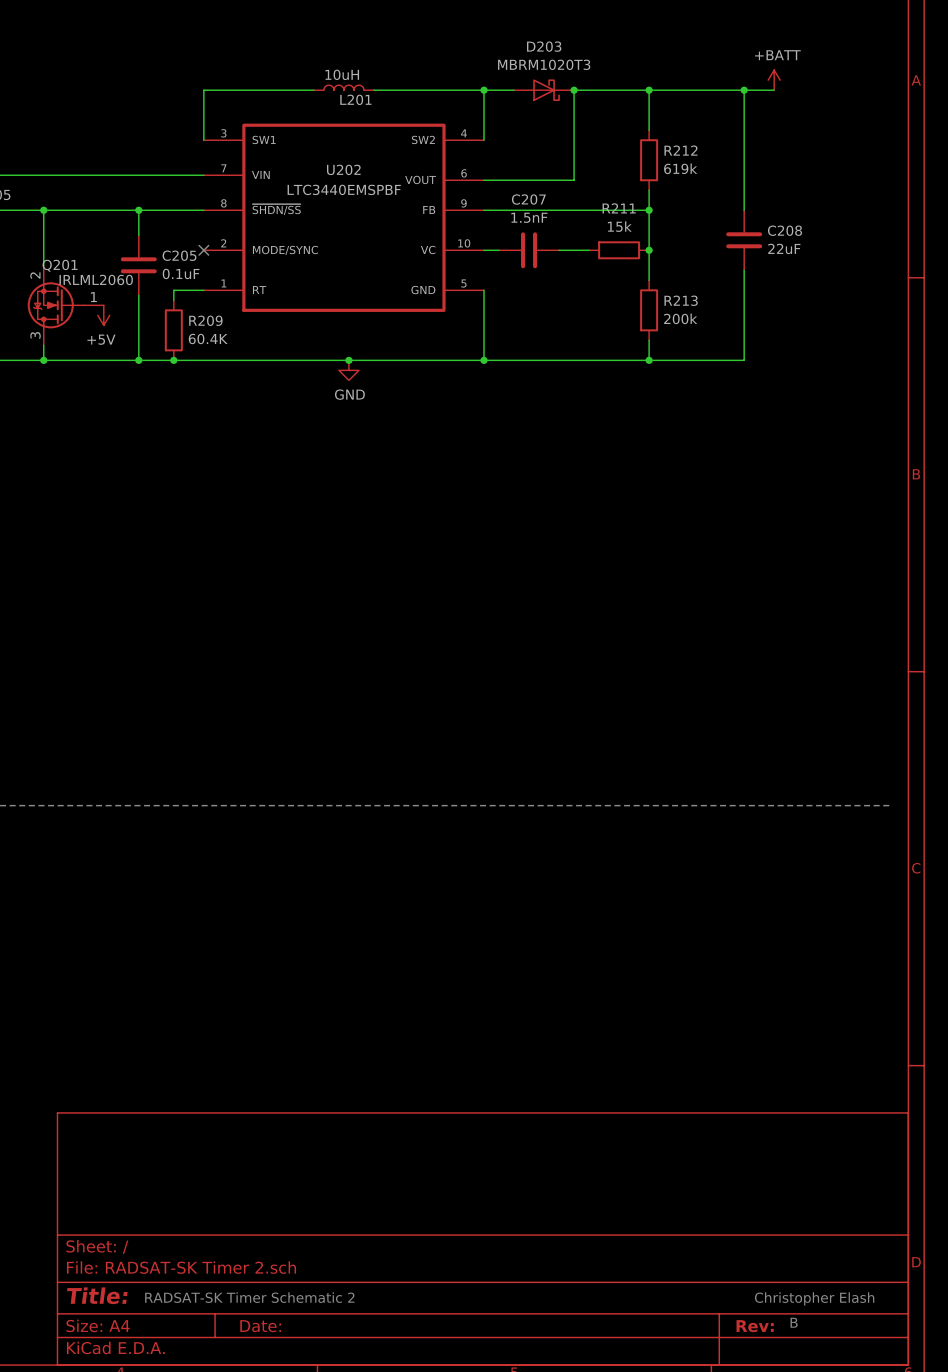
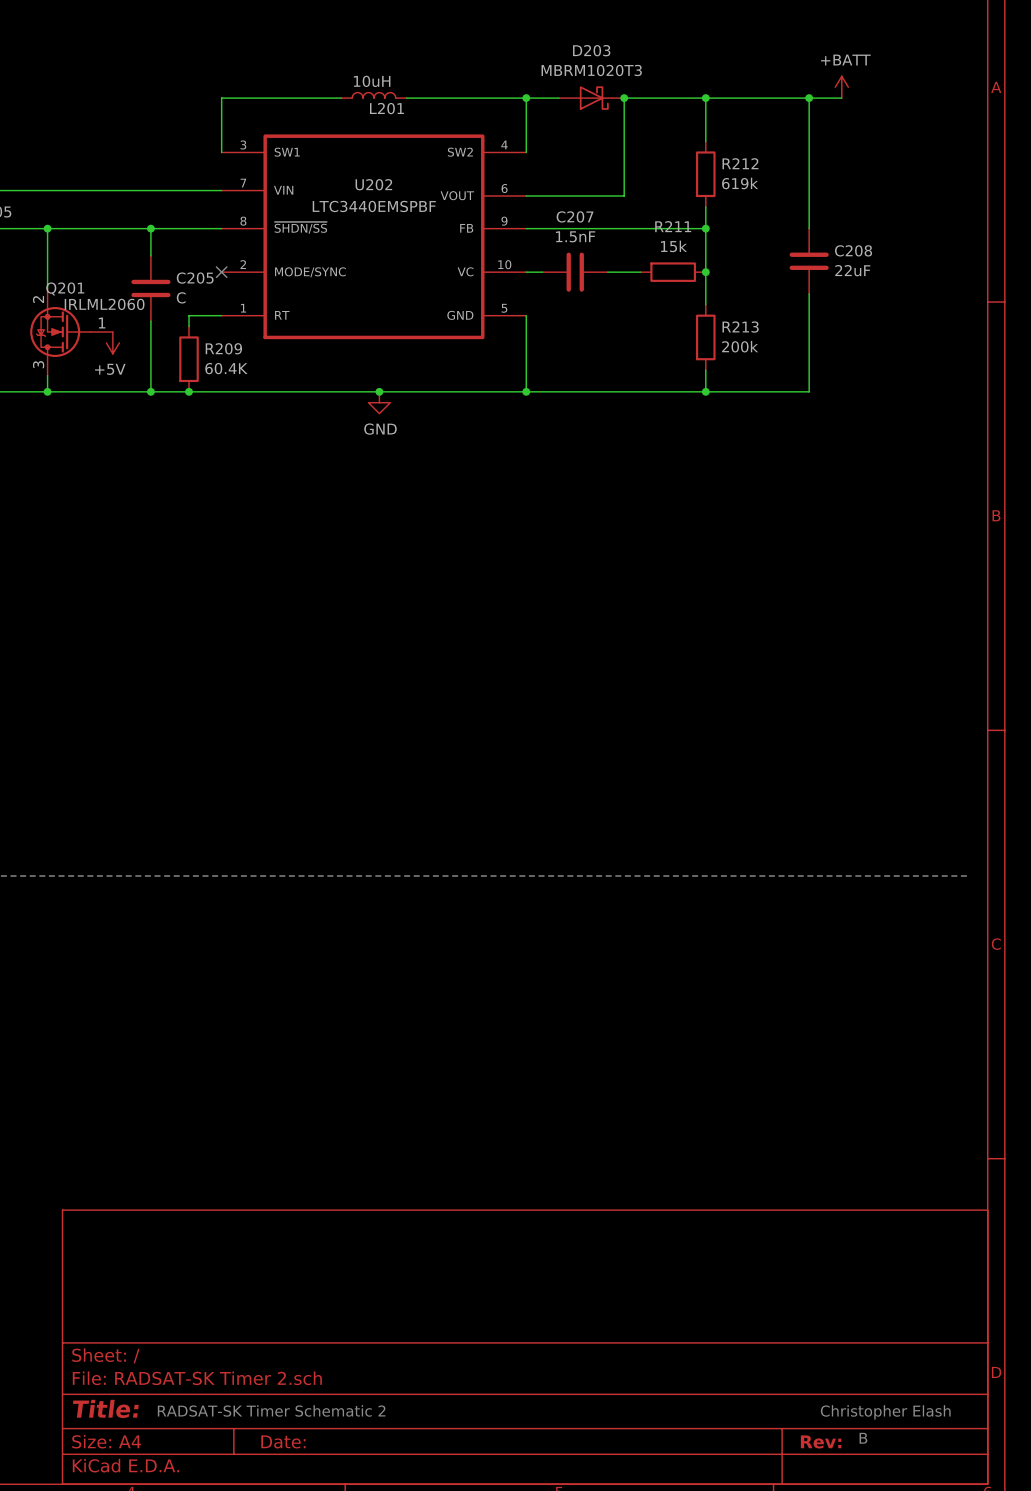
C205 value: 0.1uF (181, 273) -> C (181, 297)

